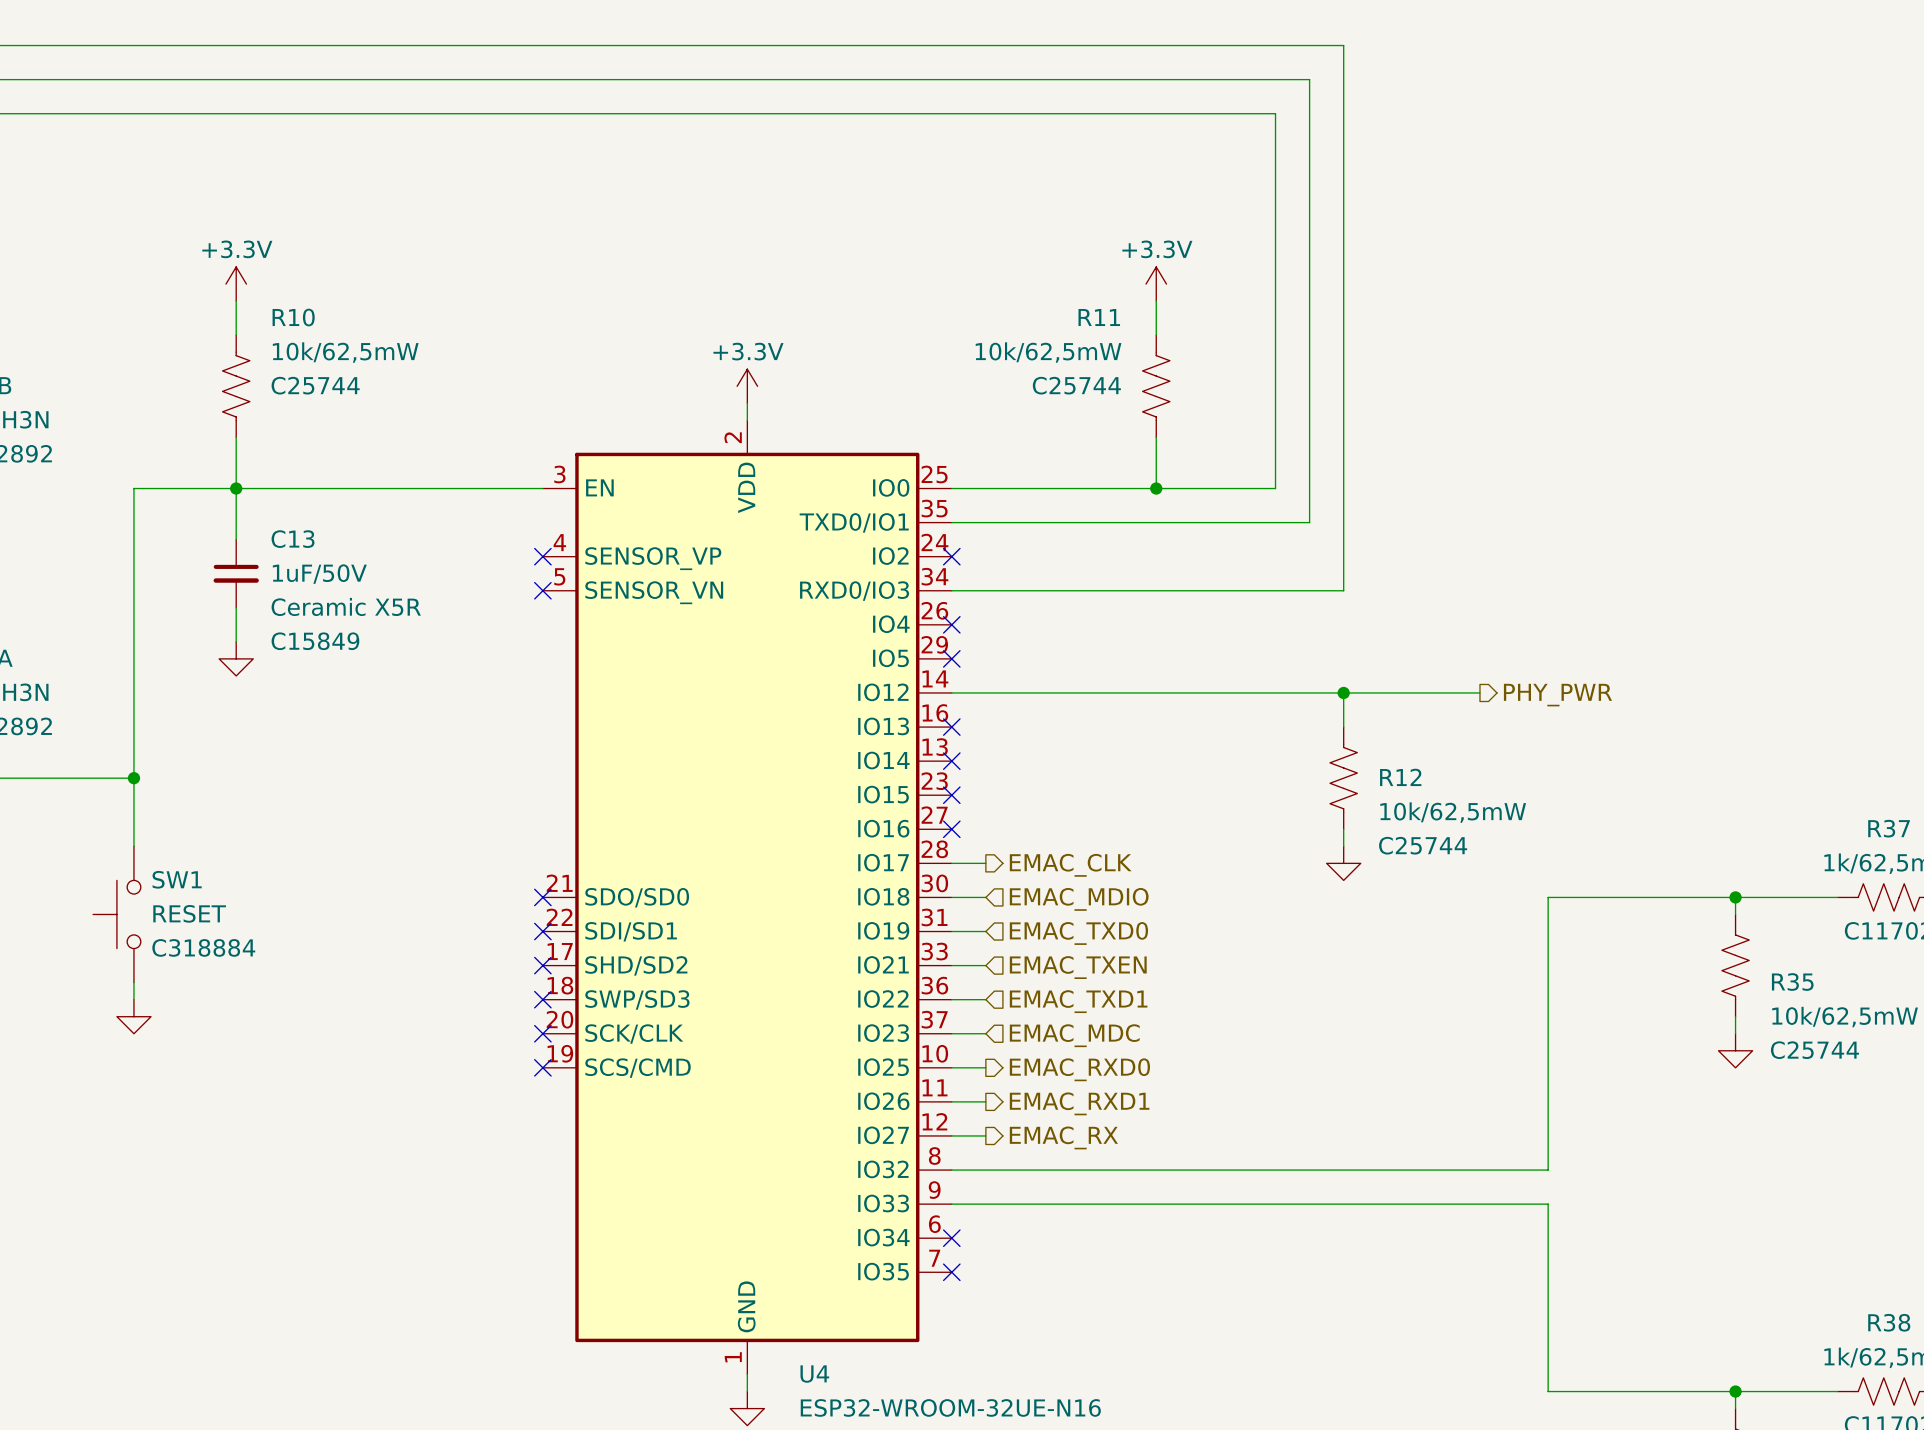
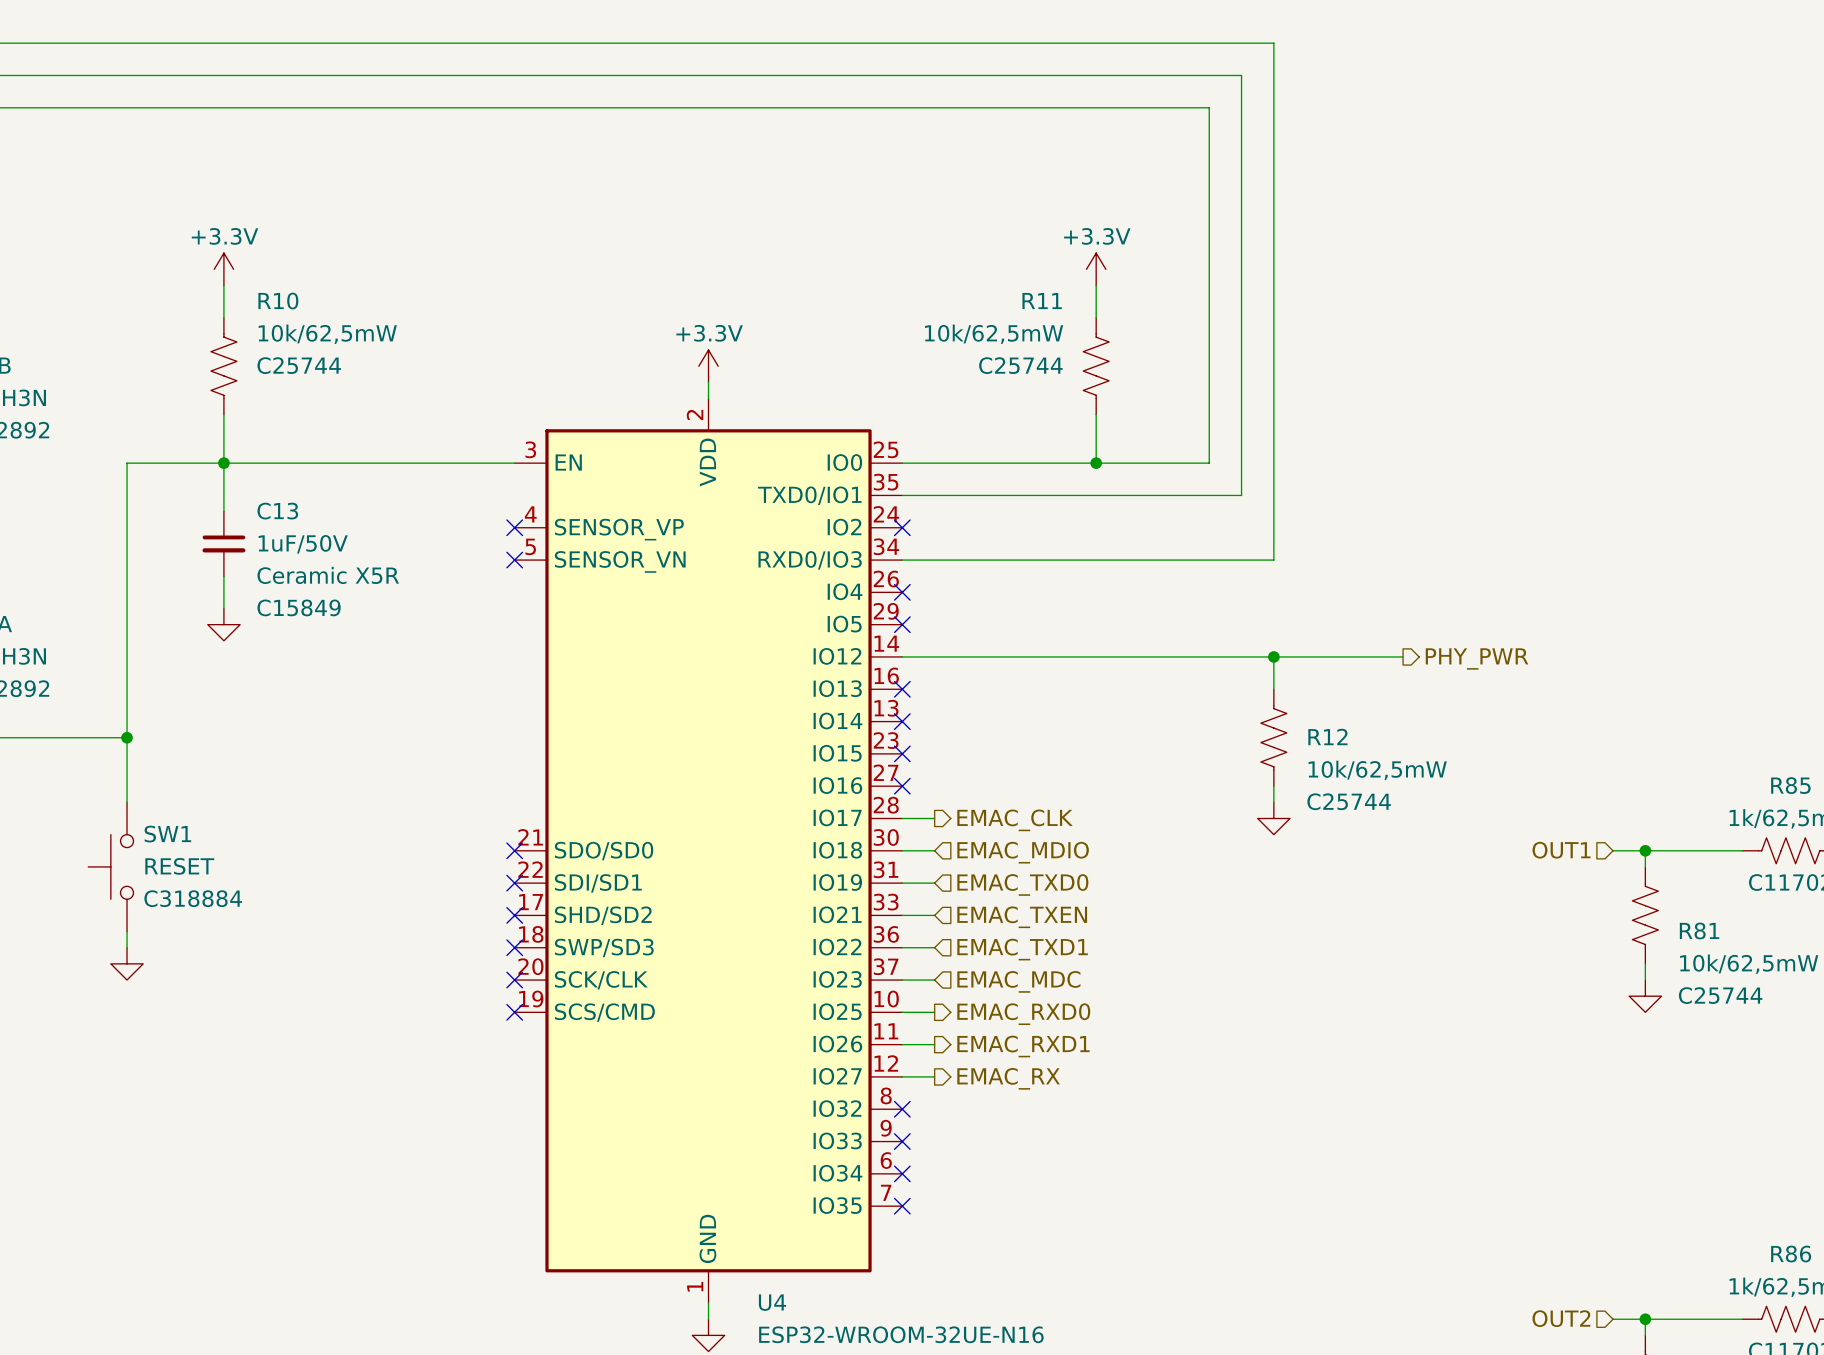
R37 name: R37 (1889, 828) -> R85 (1790, 785)
hierarchical label: none -> OUT1 (1561, 850)
wire: (1701, 897) (1548, 897) (1548, 1170) (951, 1170) -> none
R35 name: R35 (1792, 982) -> R81 (1699, 930)
no-connect mark: none -> (902, 1109)
wire: (951, 1204) (1548, 1204) (1548, 1391) (1701, 1391) -> none
no-connect mark: none -> (902, 1141)
R38 name: R38 (1889, 1322) -> R86 (1791, 1254)
hierarchical label: none -> OUT2 (1561, 1318)

